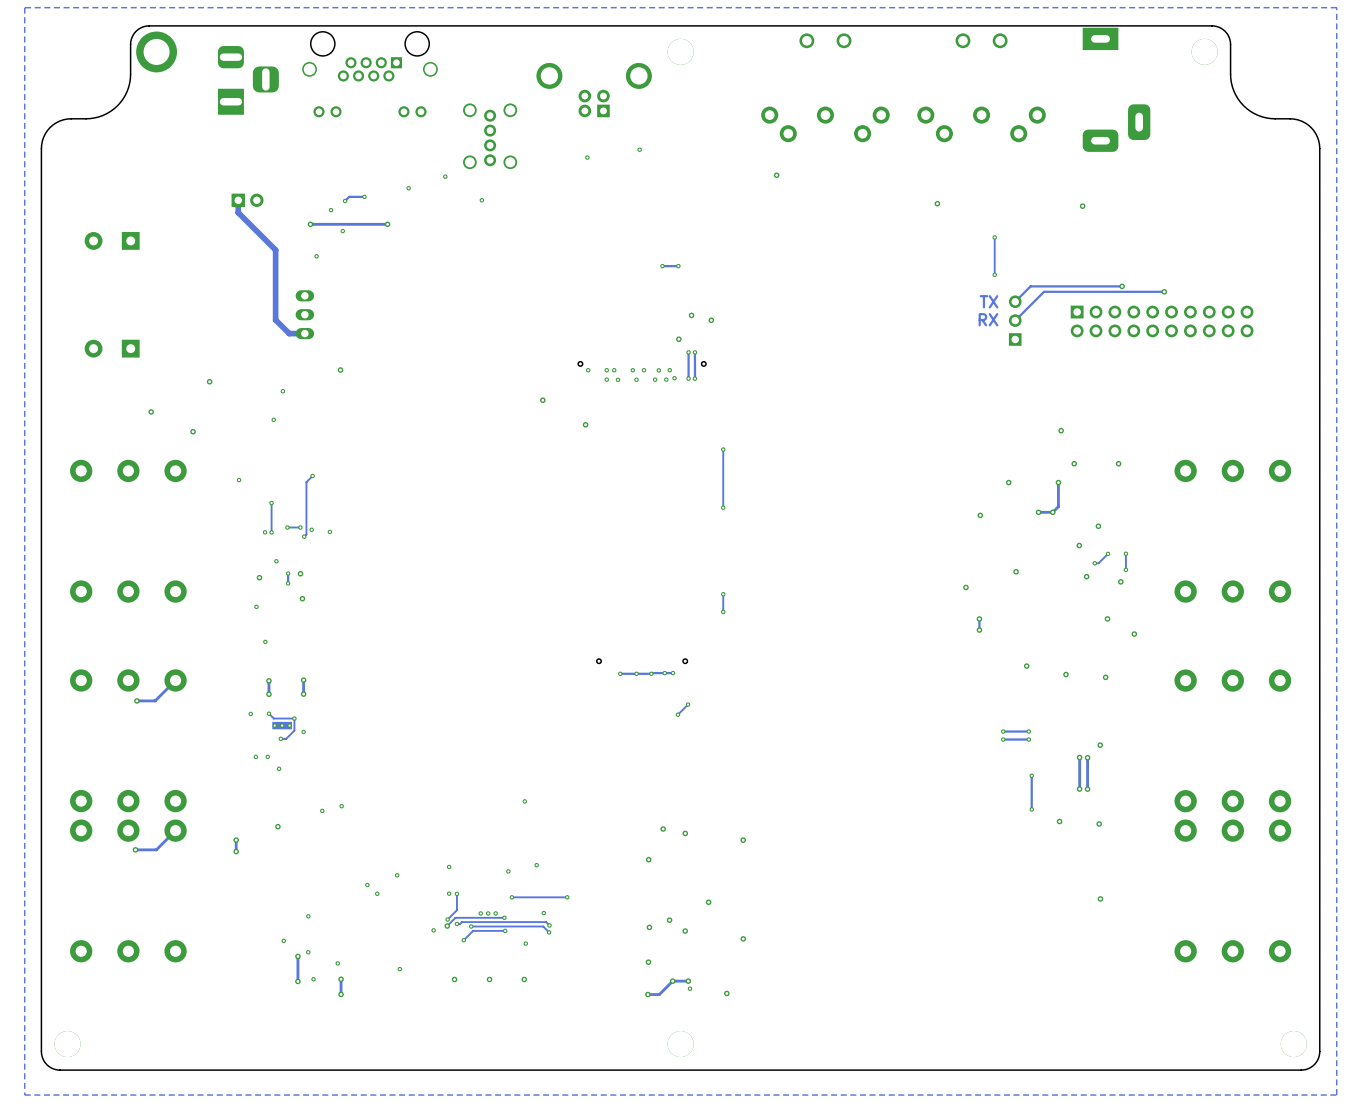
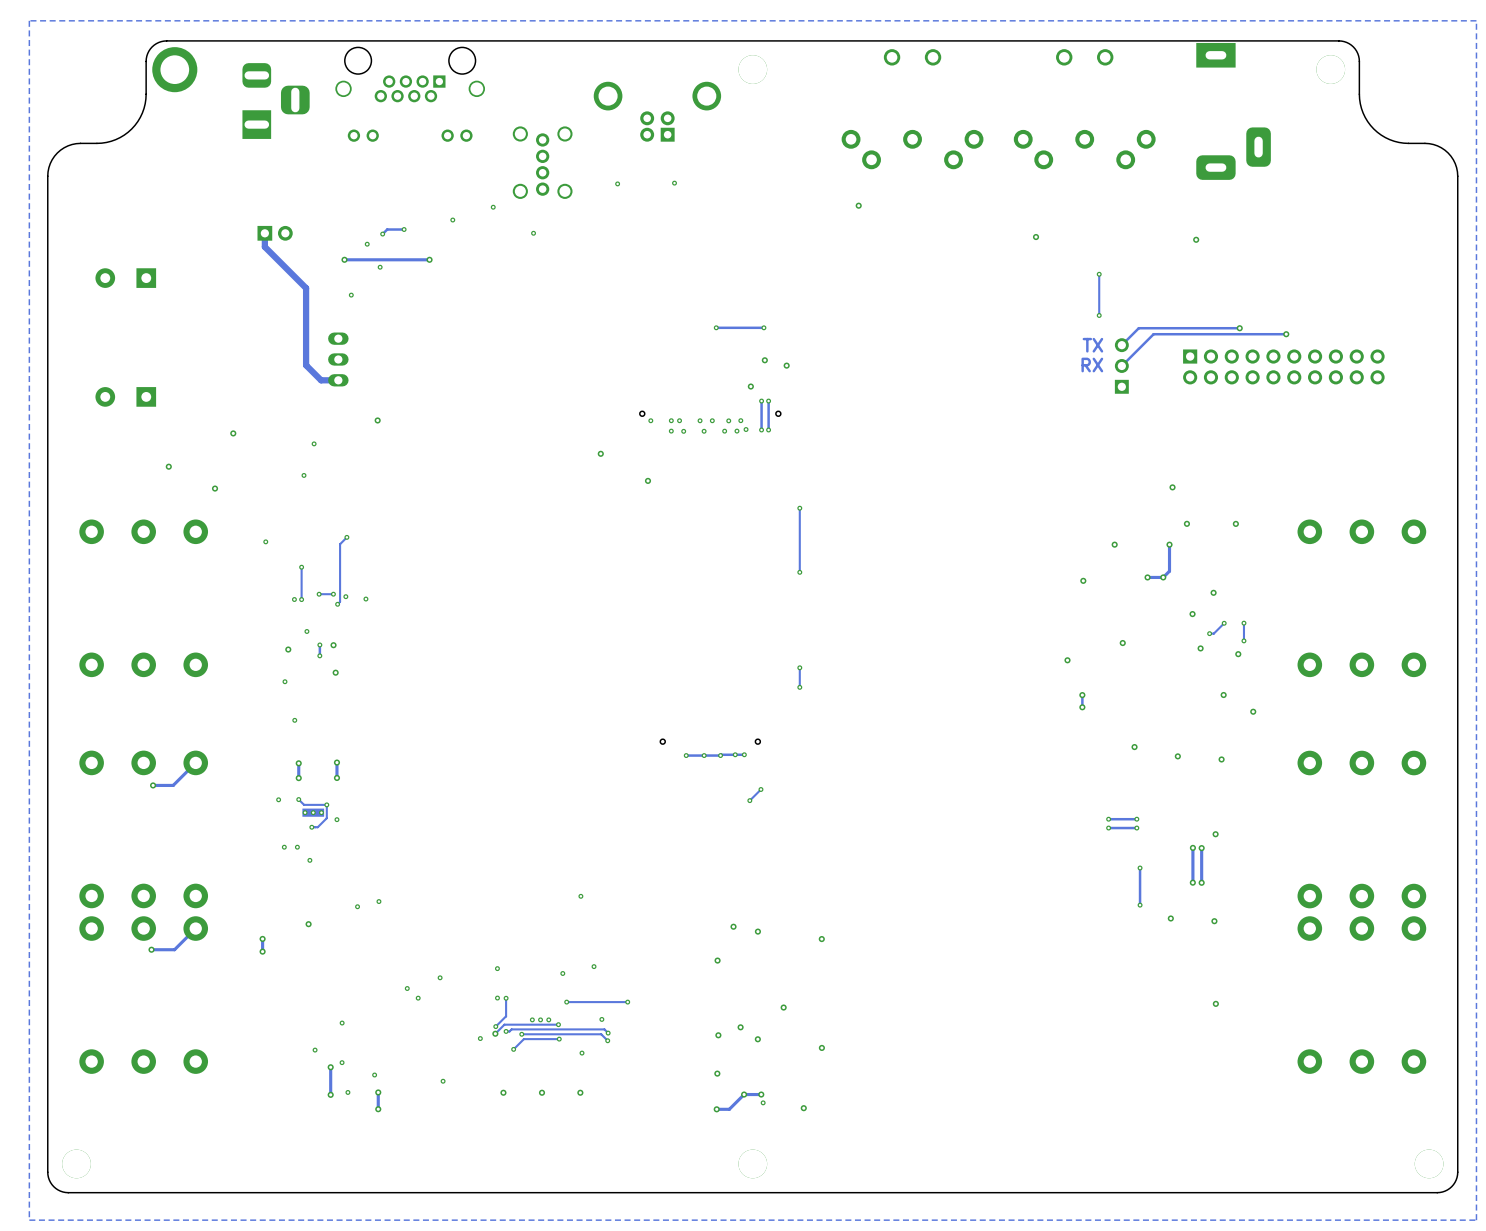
via: (639, 149) -> none
via: none -> (674, 183)
via: none -> (617, 183)
via: (587, 157) -> none
via: (662, 266) -> none
track: (678, 266) (662, 266) -> none
via: (678, 266) -> none
via: none -> (716, 327)
track: none -> (763, 327) (716, 327)
via: none -> (763, 327)

